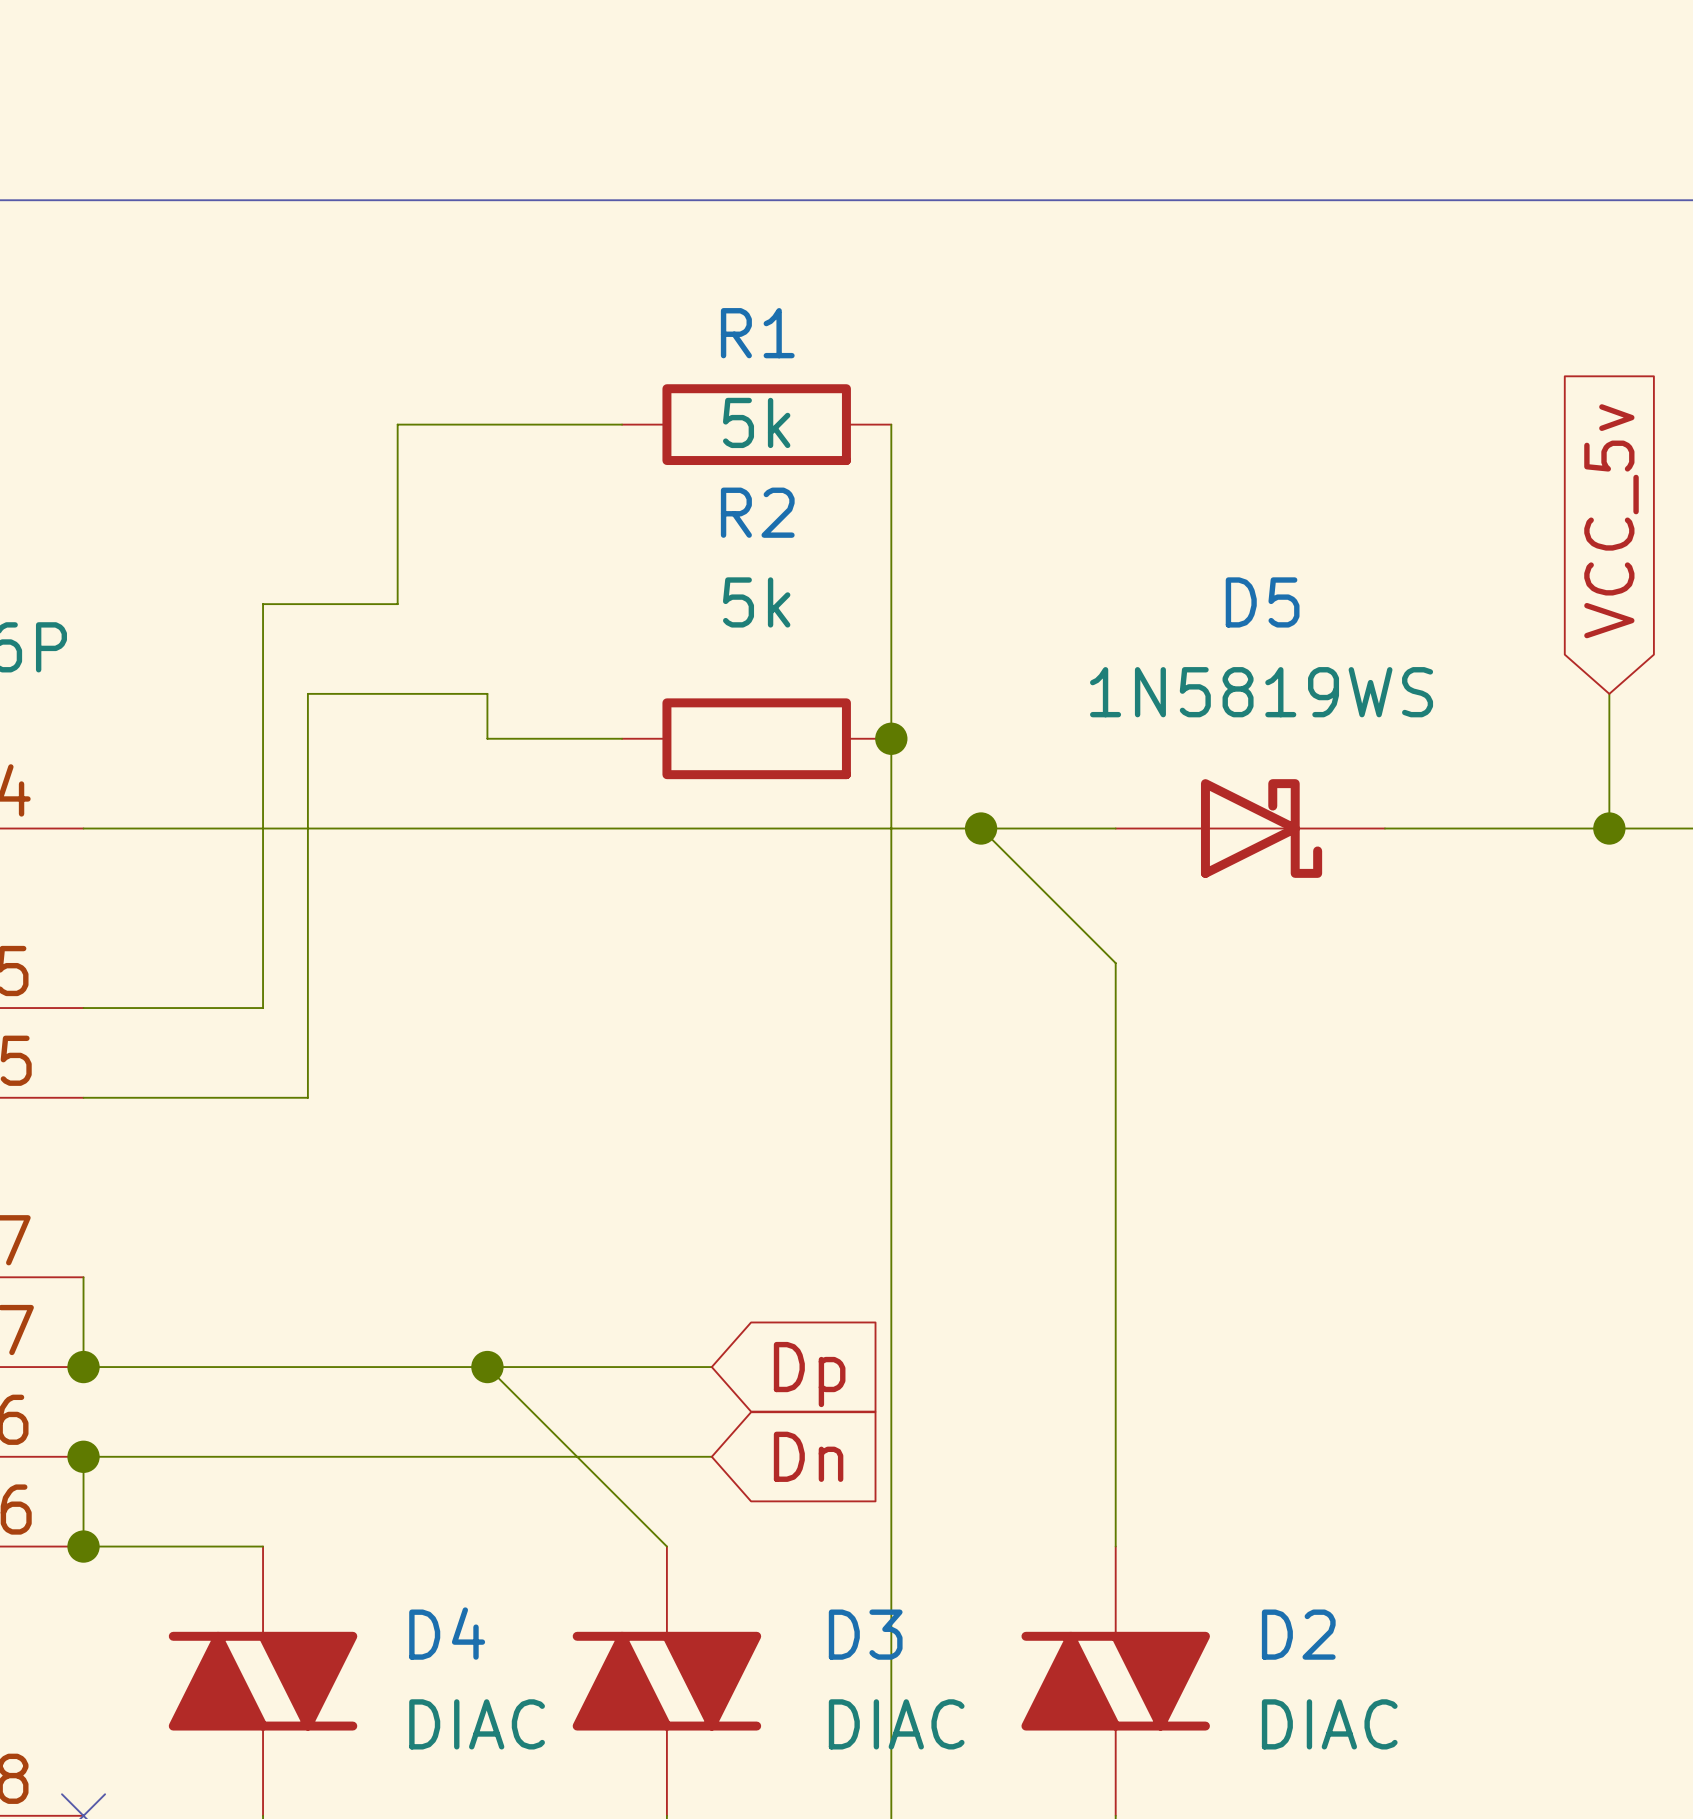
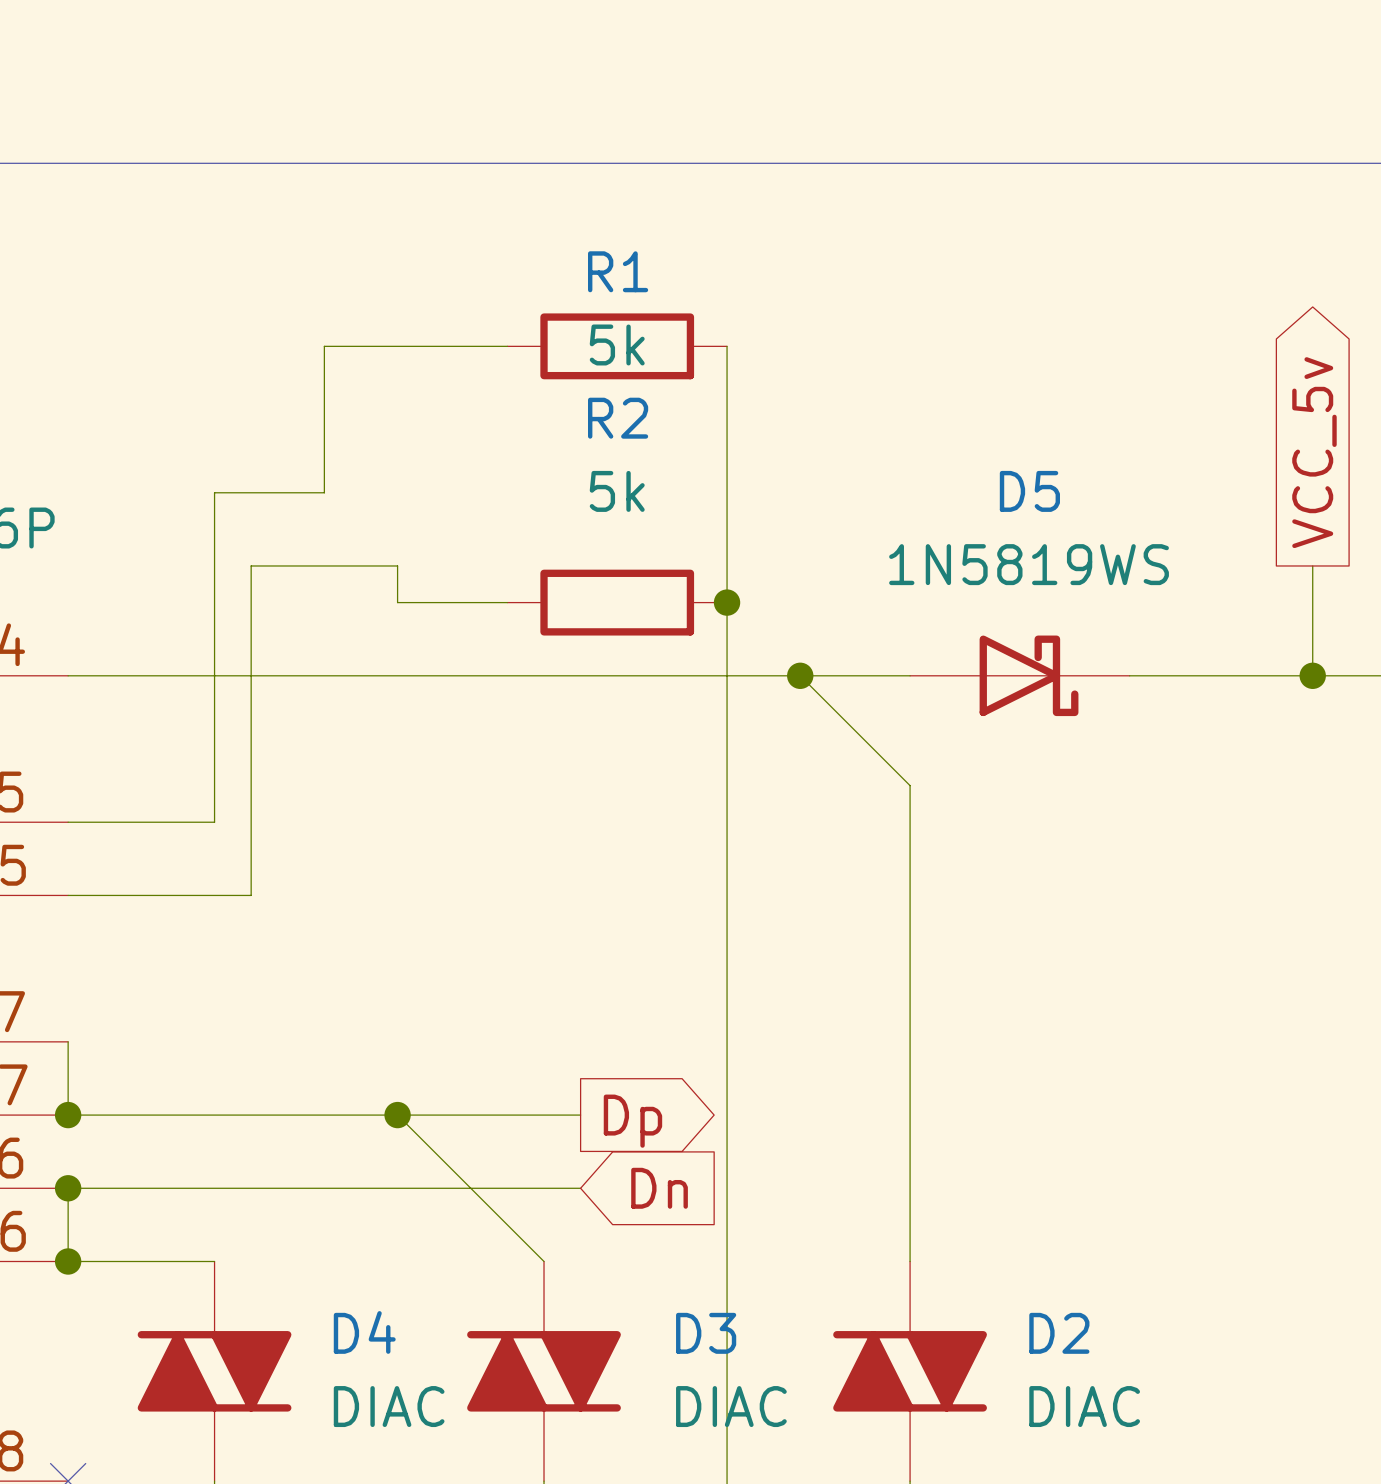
global label shape: input (1611, 521) -> output (1314, 452)
global label shape: input (809, 1374) -> output (632, 1121)

